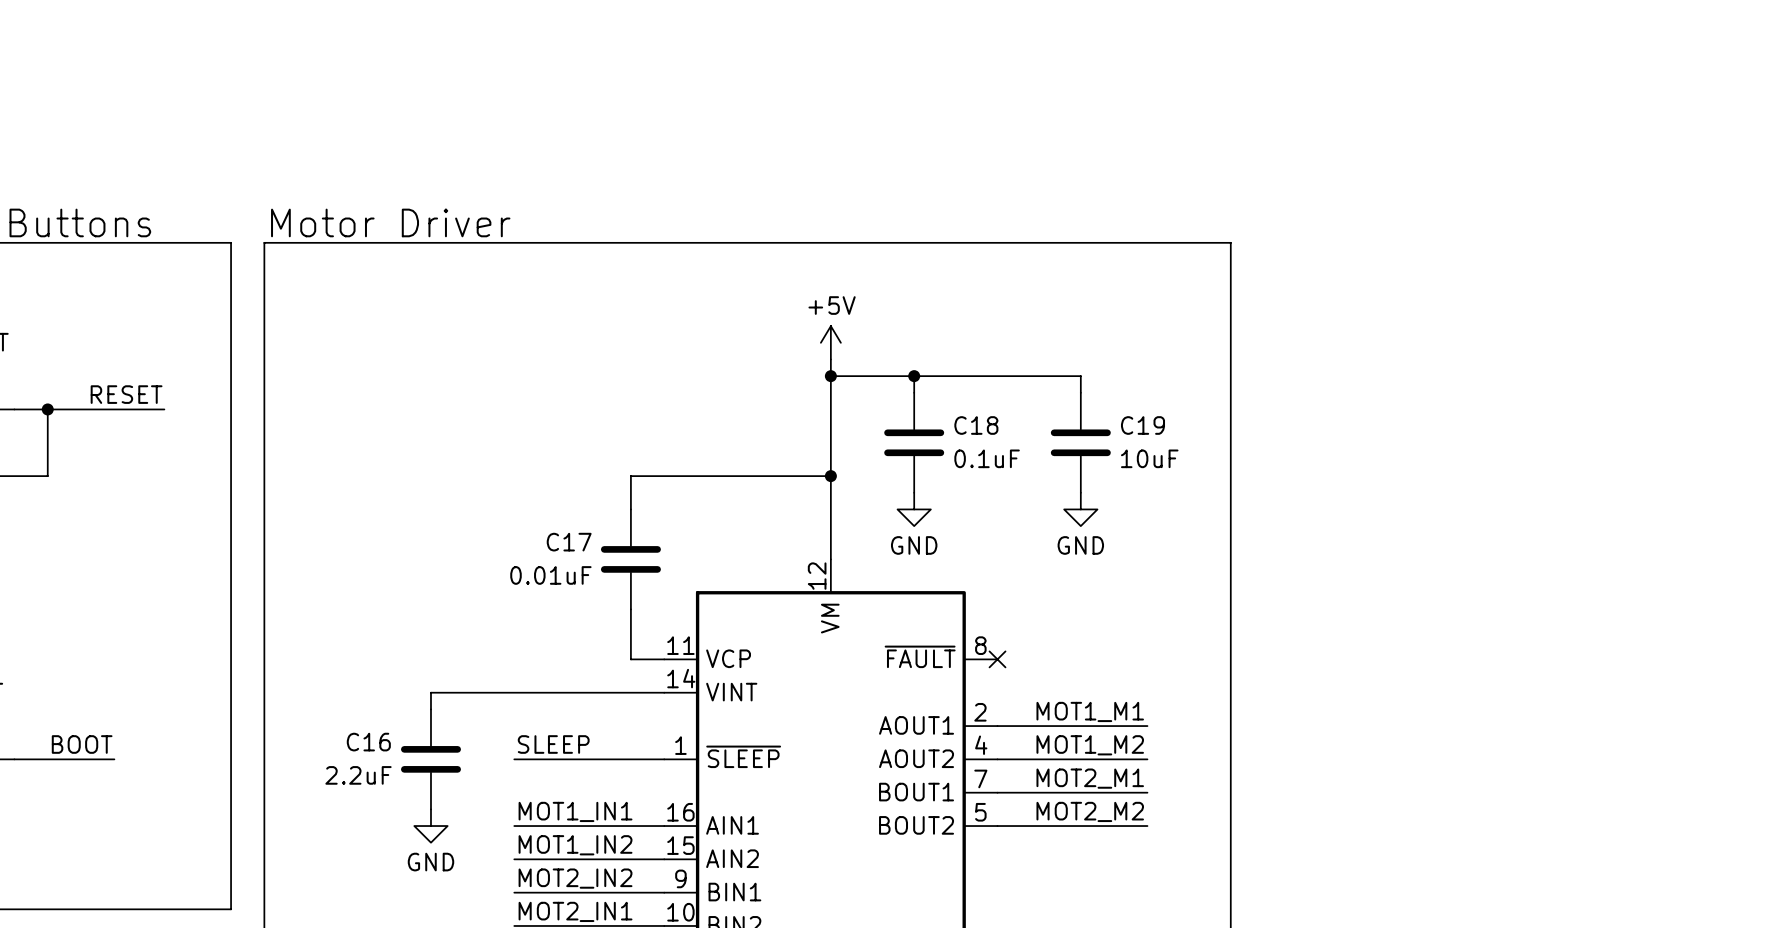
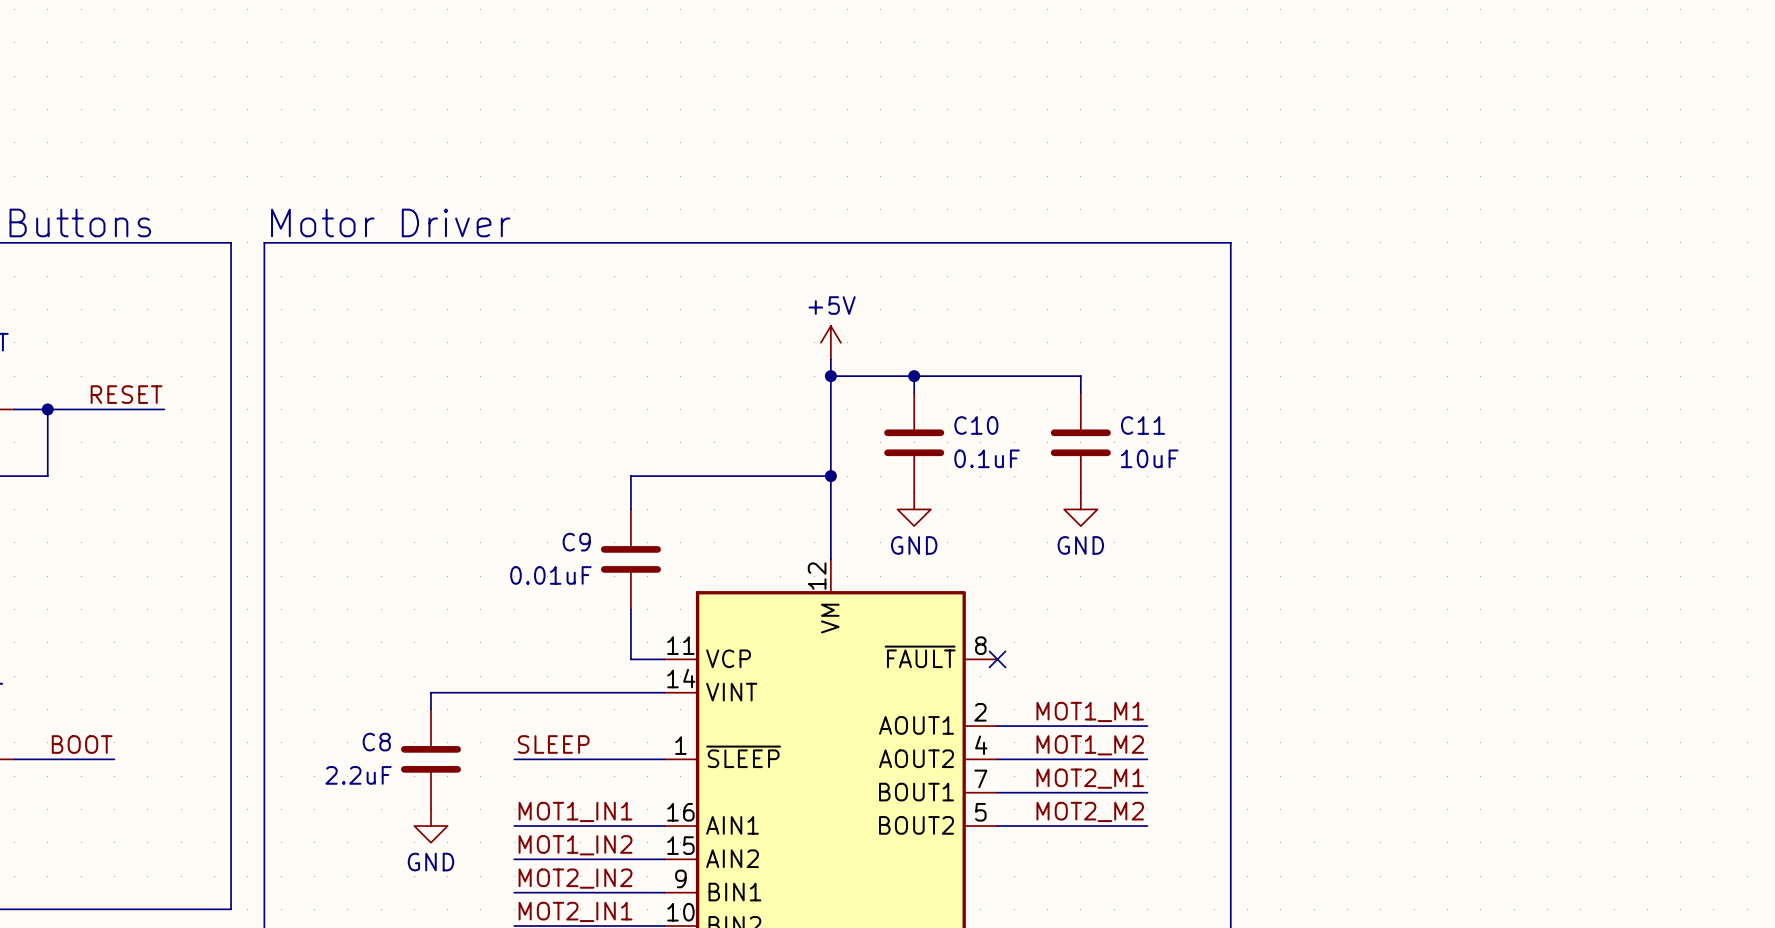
C18 name: C18 (976, 425) -> C10 (976, 425)
C19 name: C19 (1142, 425) -> C11 (1142, 425)
C17 name: C17 (569, 542) -> C9 (576, 542)
C16 name: C16 (368, 742) -> C8 (376, 742)

